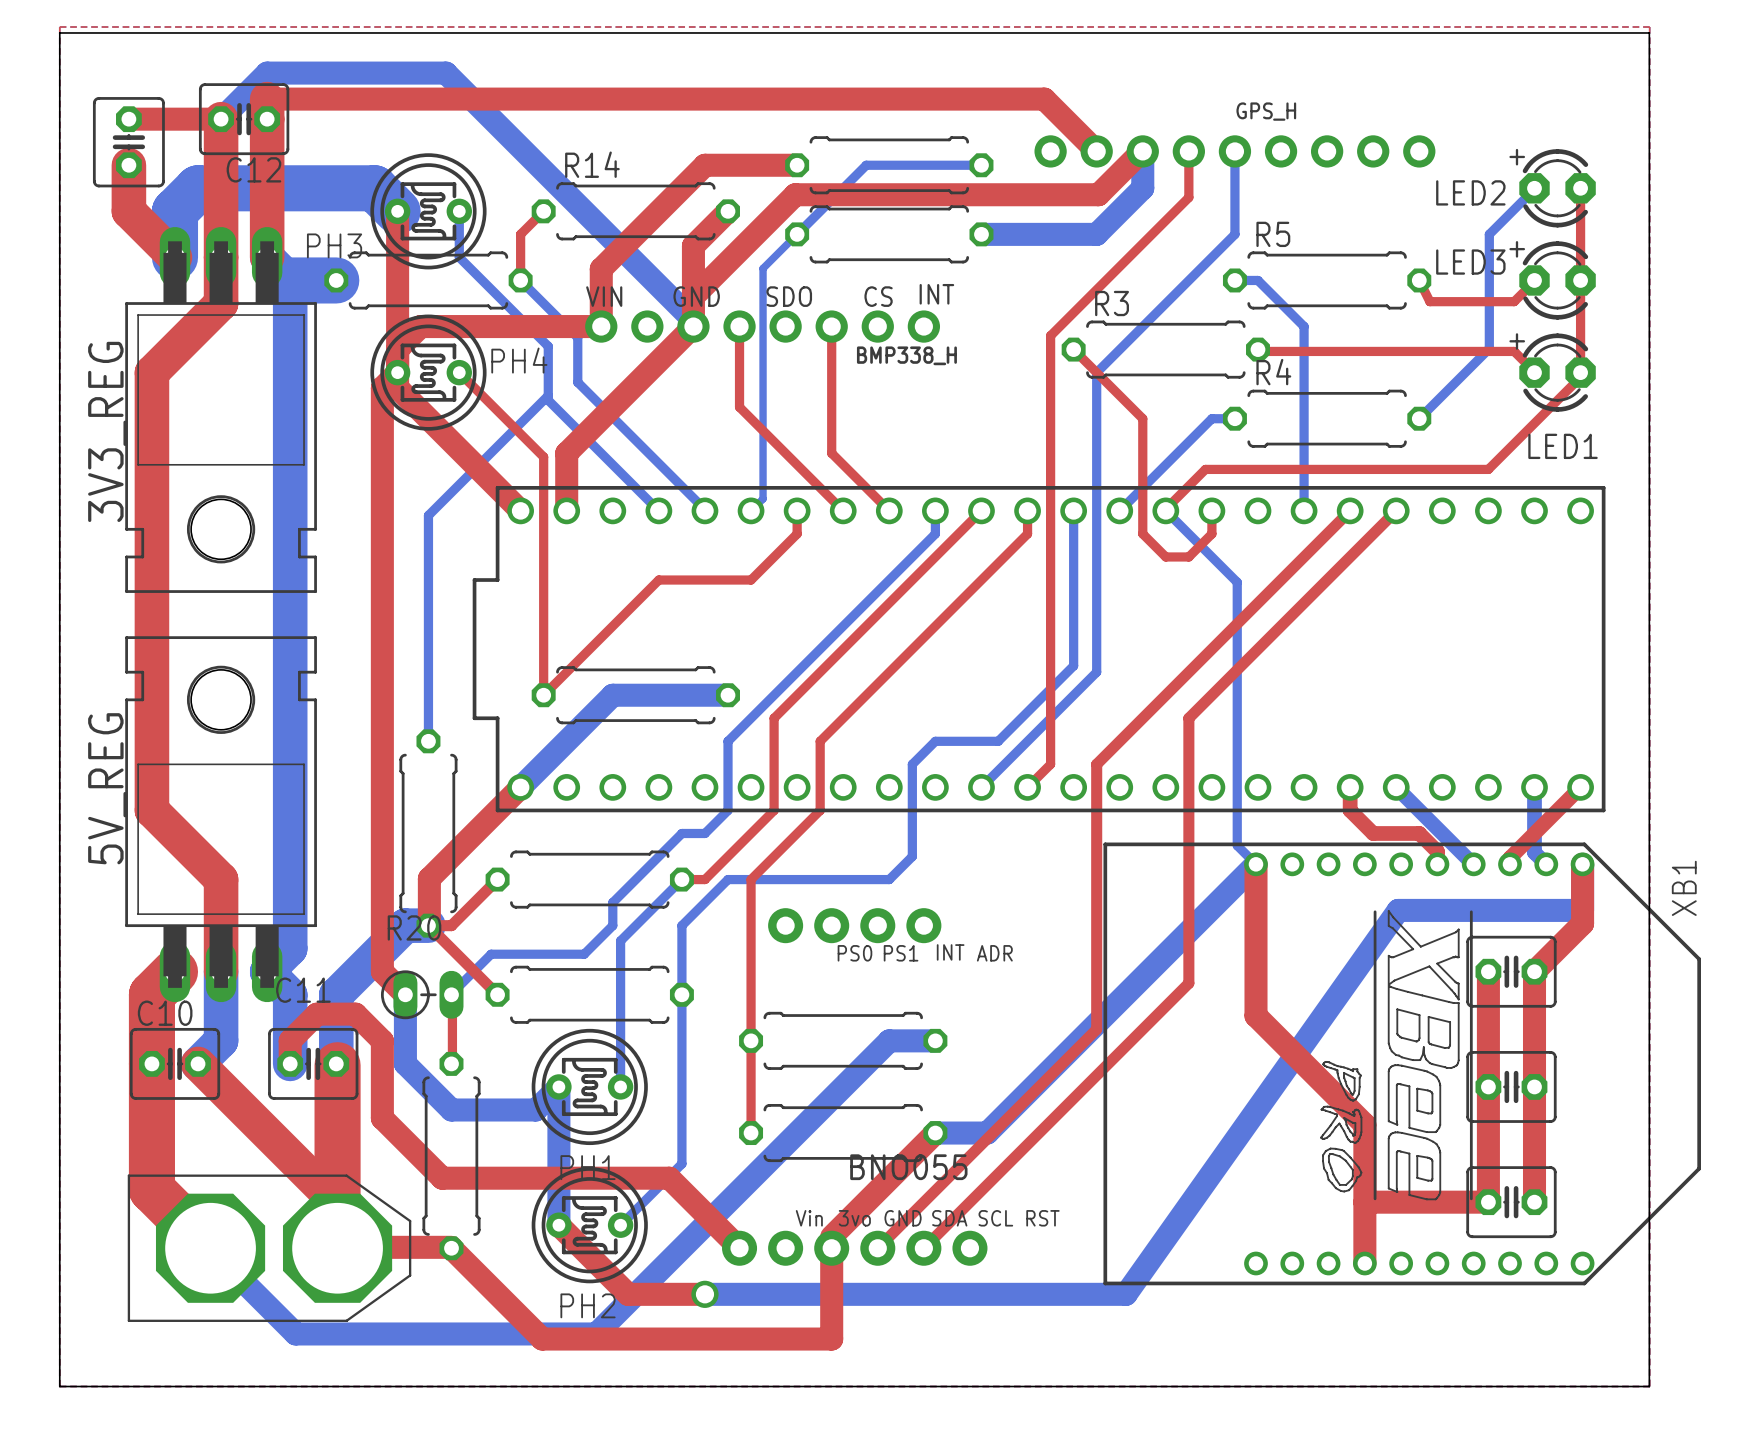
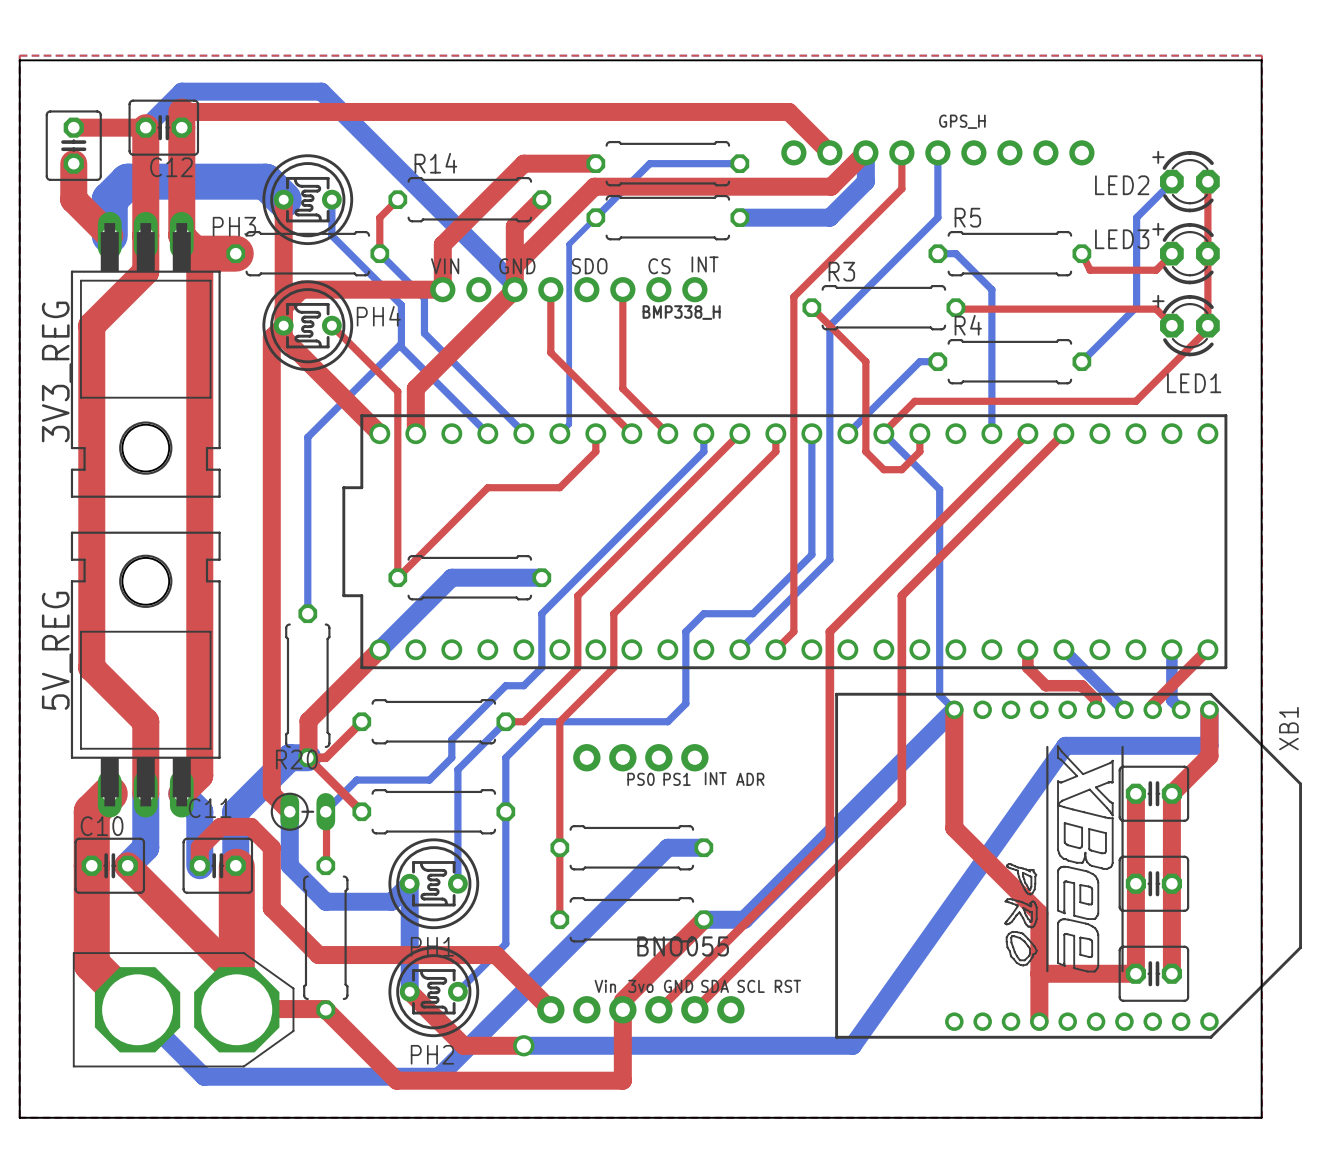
bottom track: (290, 280) (290, 948) (267, 971) -> none
bottom track: (290, 280) (336, 280) -> none
top track: none -> (199, 253) (199, 775) (181, 793)
top track: none -> (199, 253) (235, 253)

